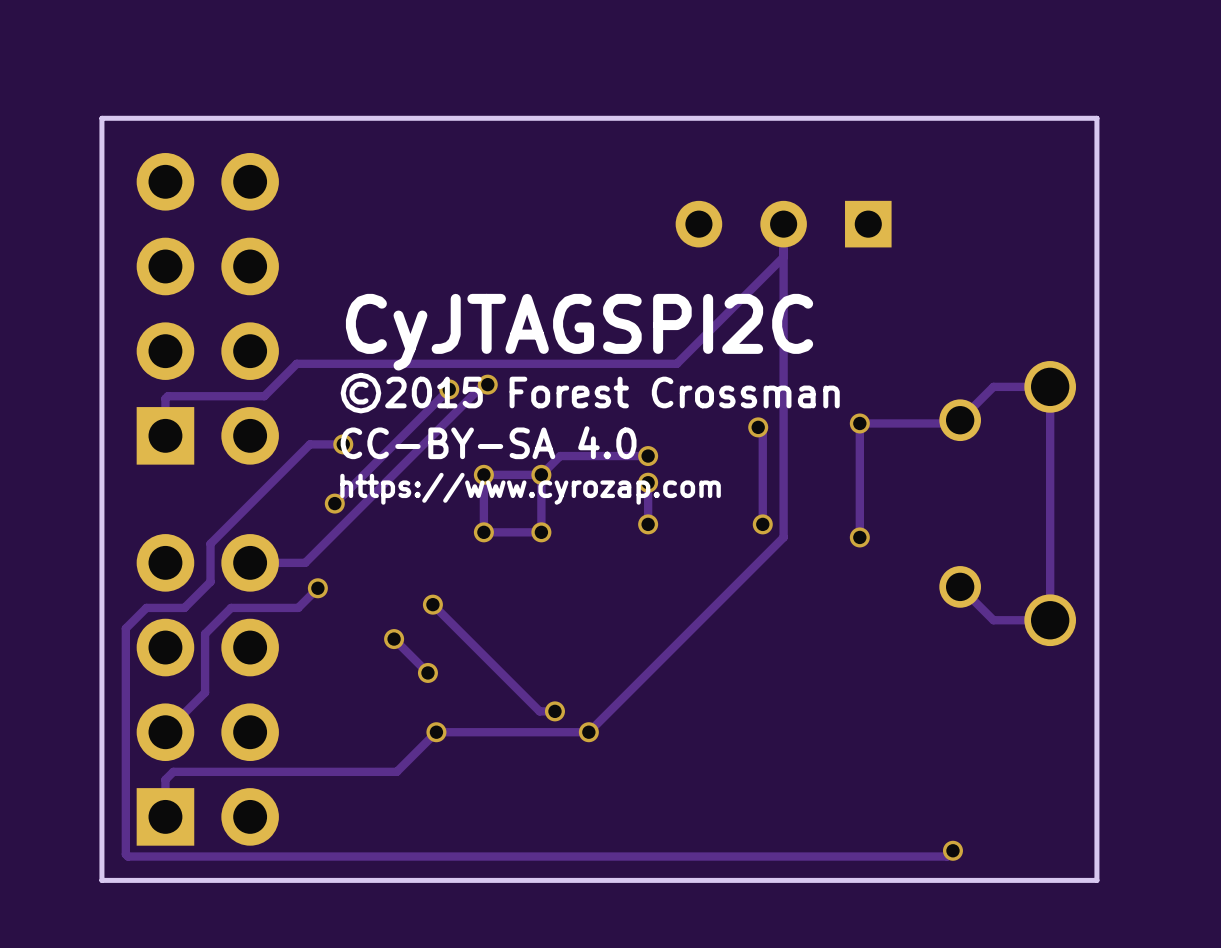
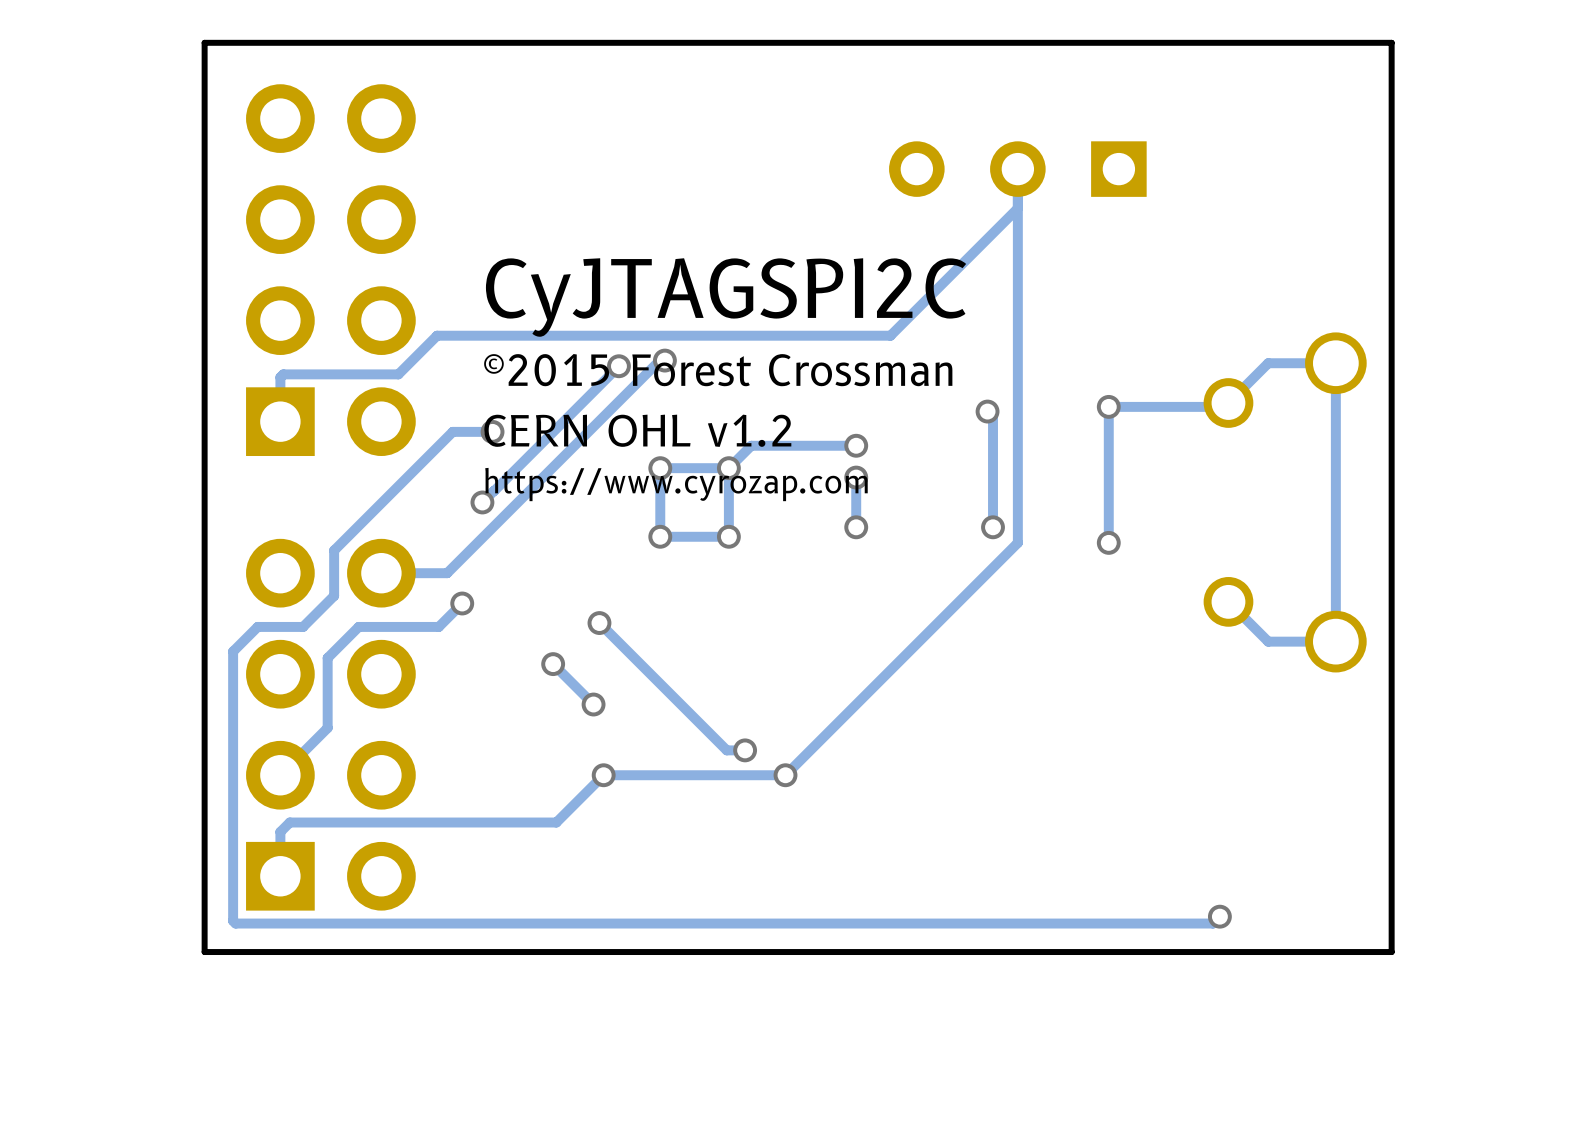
text: CC-BY-SA 4.0 (488, 442) -> CERN OHL v1.2 (637, 430)

